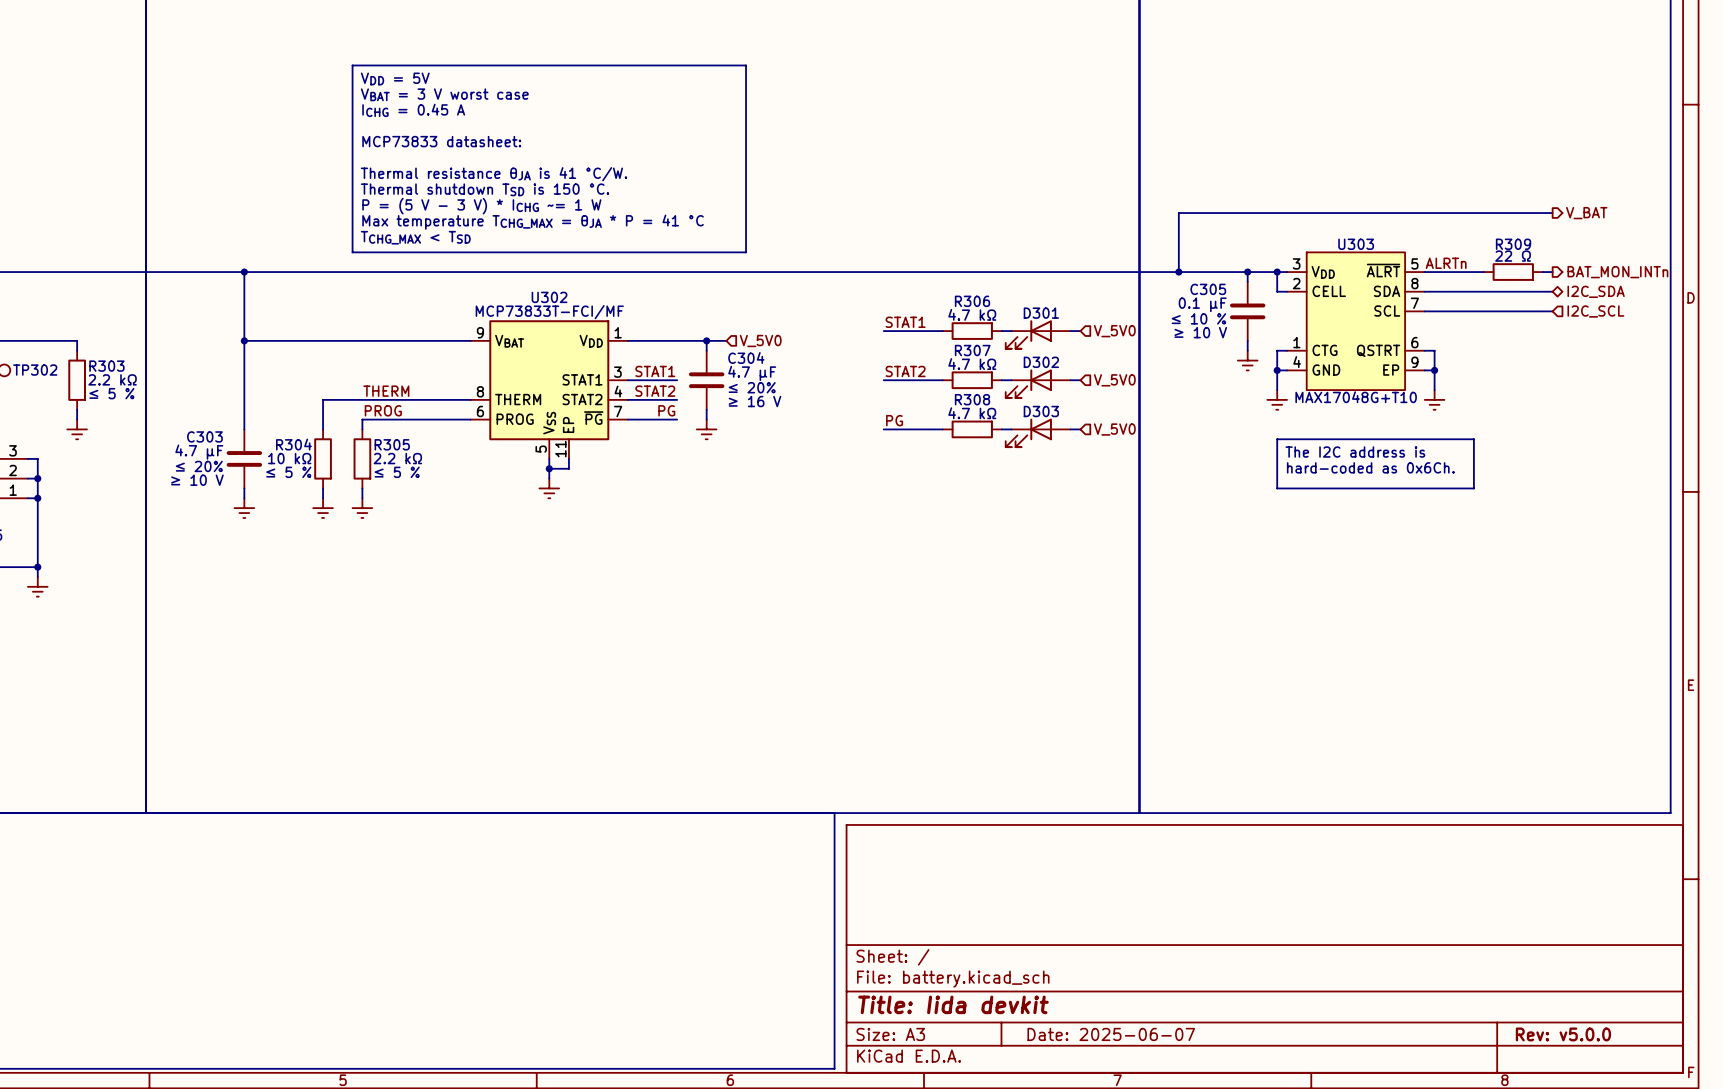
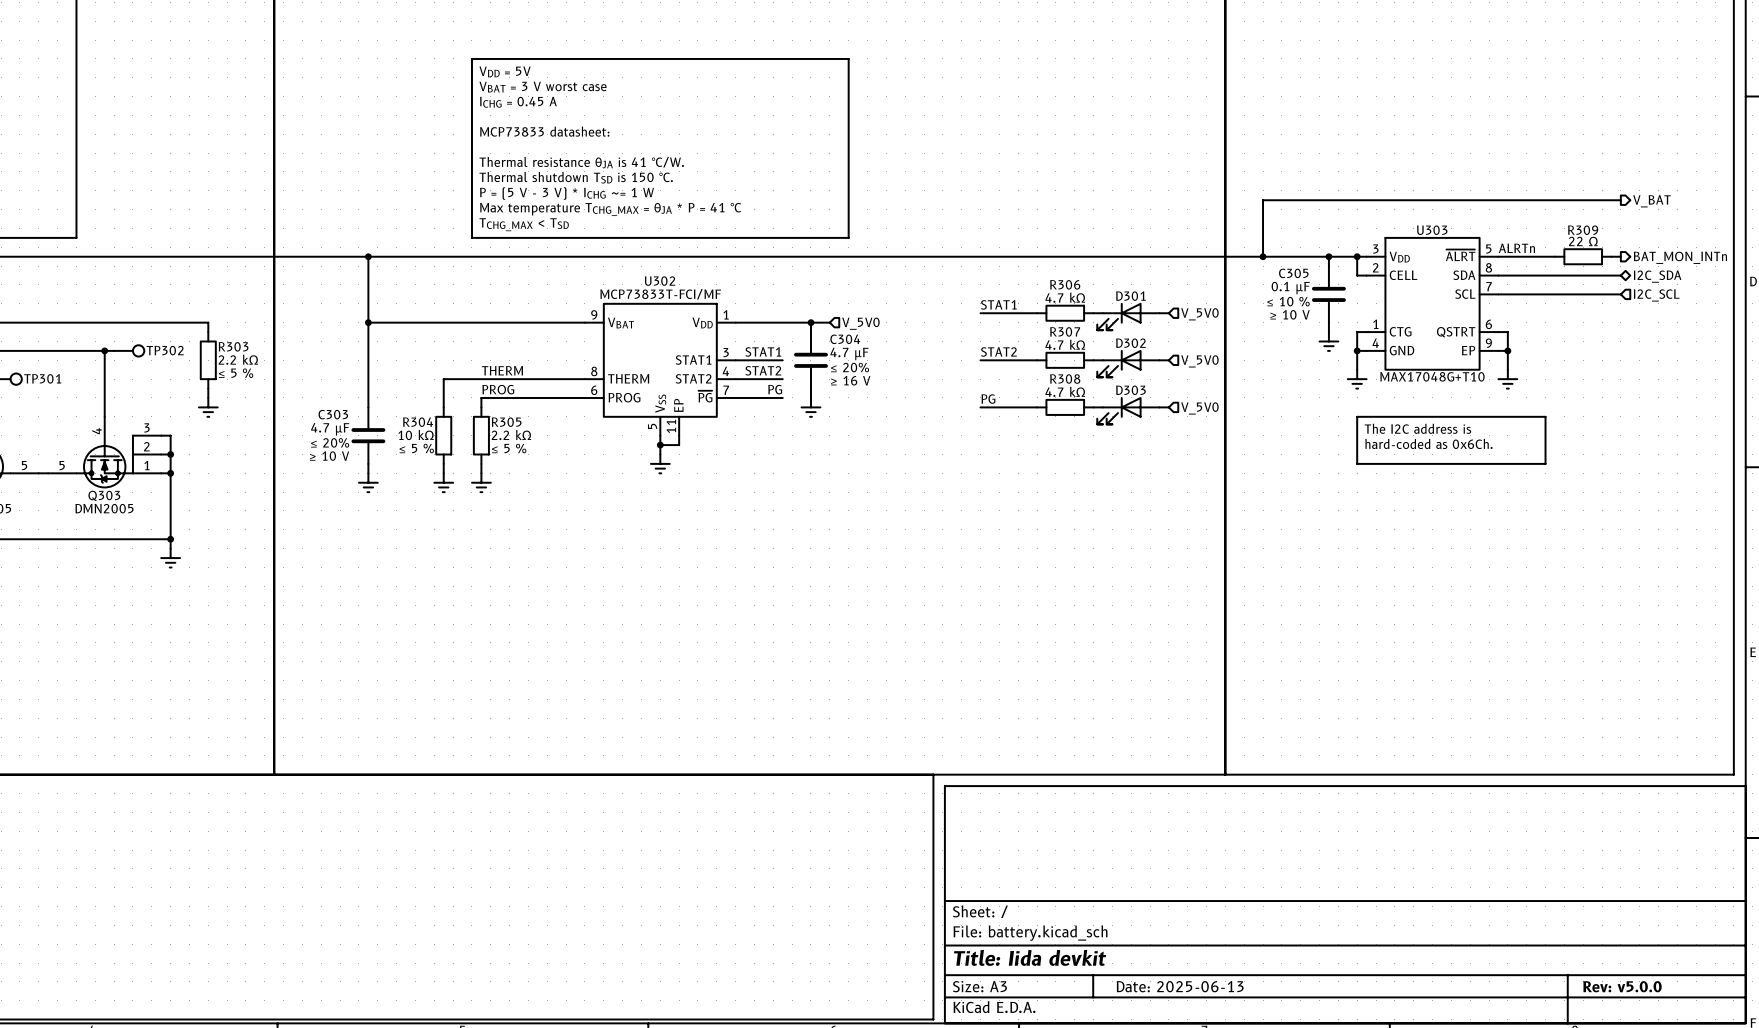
title block: Date: 2025-06-07 (1111, 1034) -> Date: 2025-06-13 (1180, 986)

